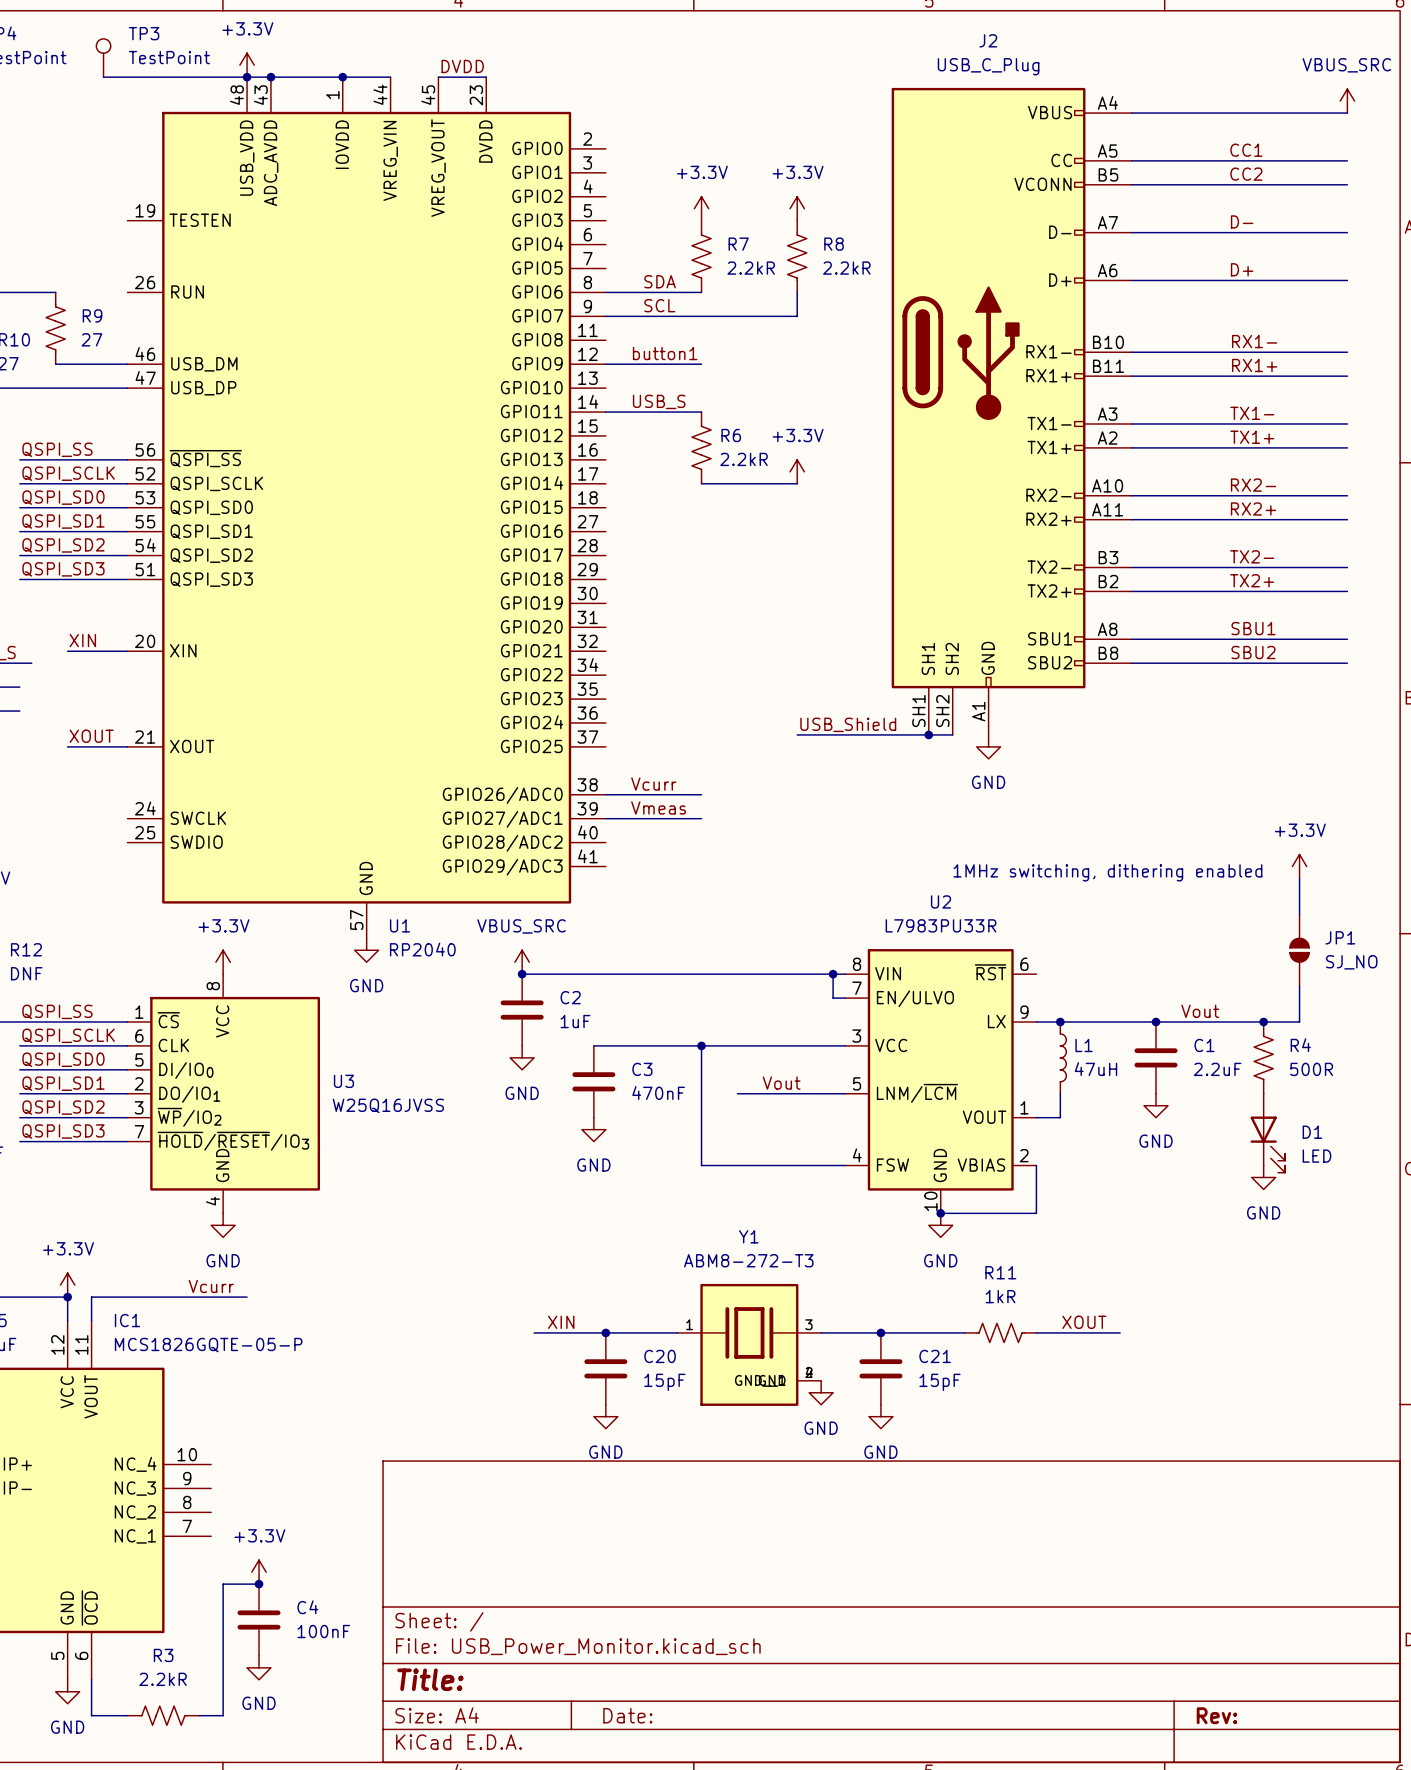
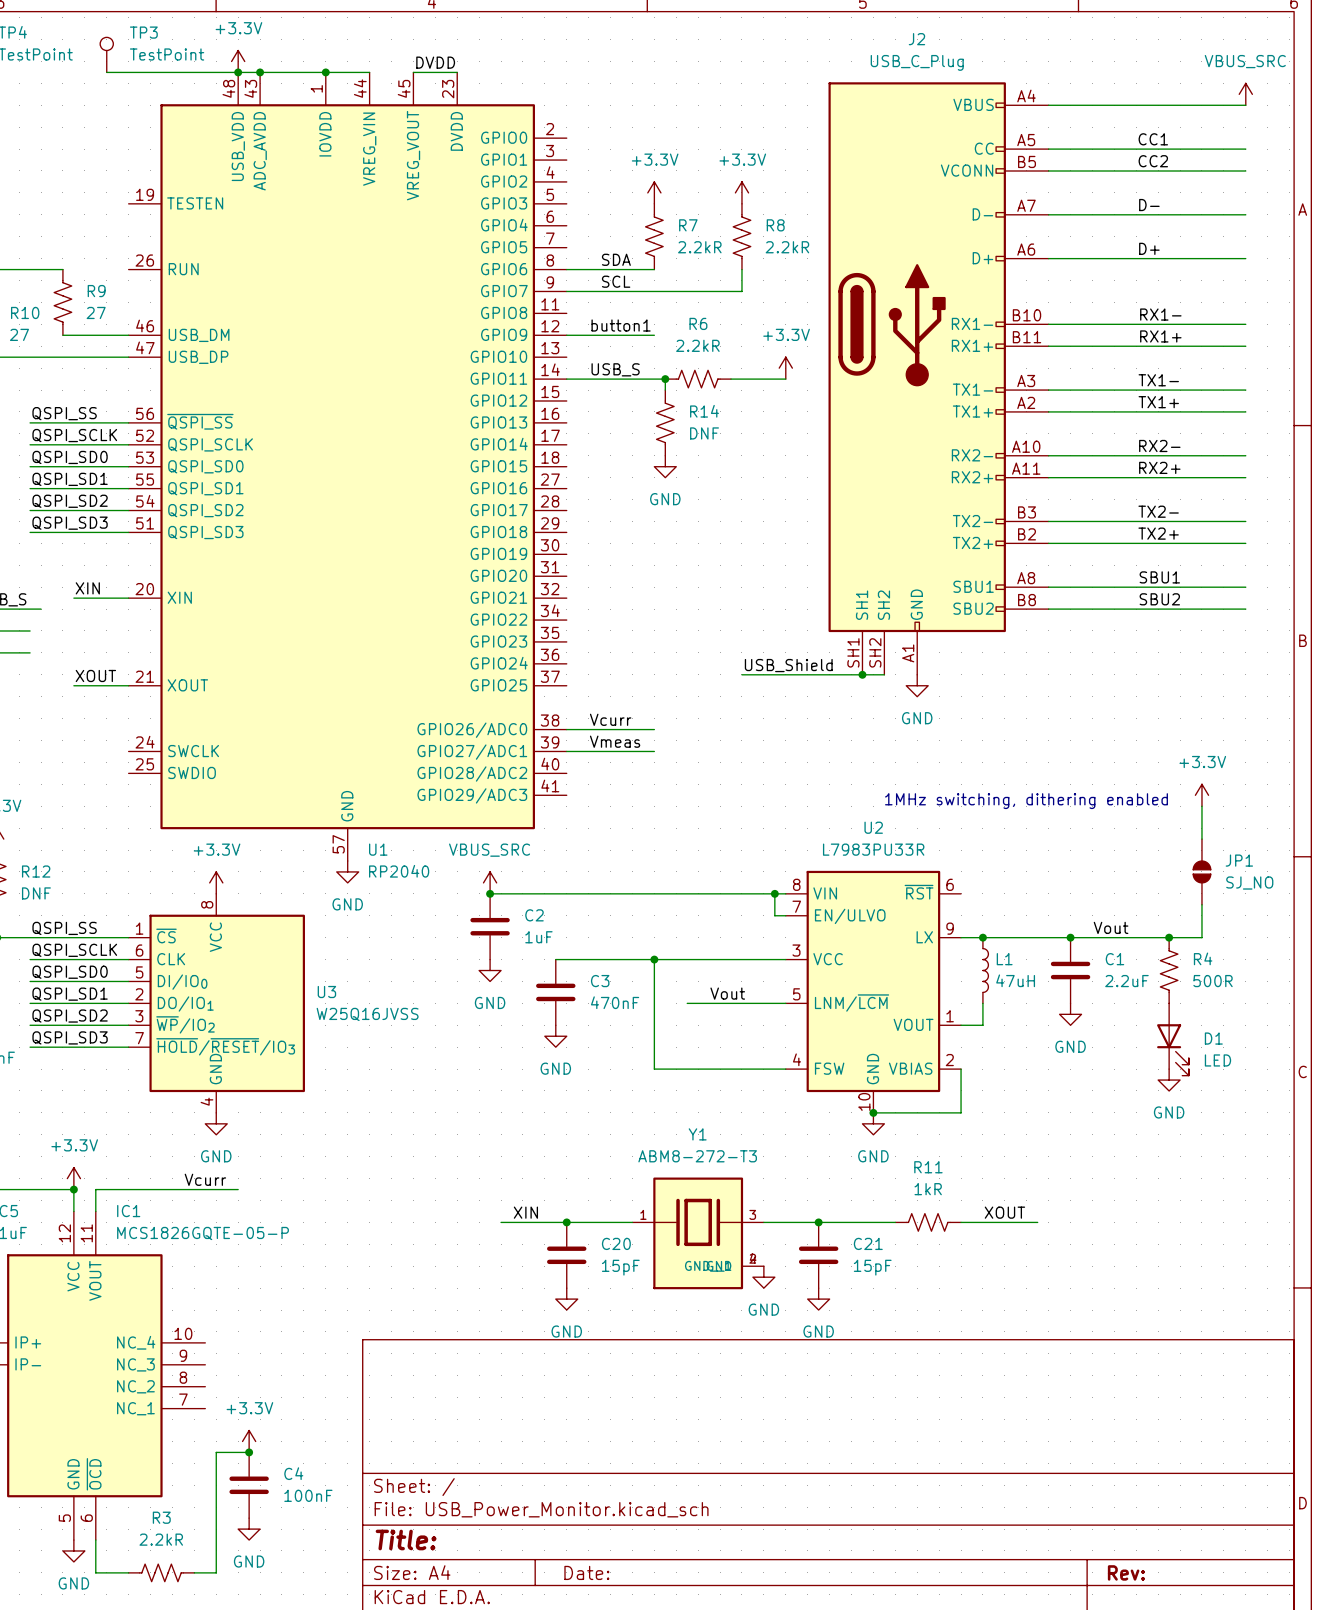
wire: none -> (654, 379) (665, 379) (665, 390)
junction: none -> (665, 379)
wire: none -> (731, 379) (785, 379)
R6 name position: R6 (731, 435) -> R6 (698, 323)
R6 rotation: 0° (701, 447) -> 90° clockwise (698, 379)
R6 position: (701, 447) -> (698, 379)
R14: none -> DNF (665, 422)
R6 value position: 2.2kR (744, 459) -> 2.2kR (697, 345)
power symbol position: +3.3V (797, 471) -> +3.3V (785, 368)
wire: (701, 483) (797, 483) -> none
power symbol: none -> GND (665, 466)

